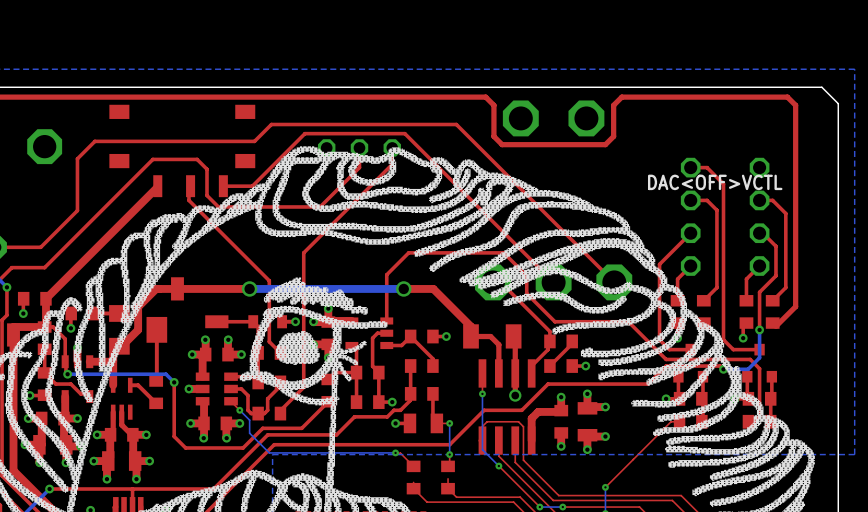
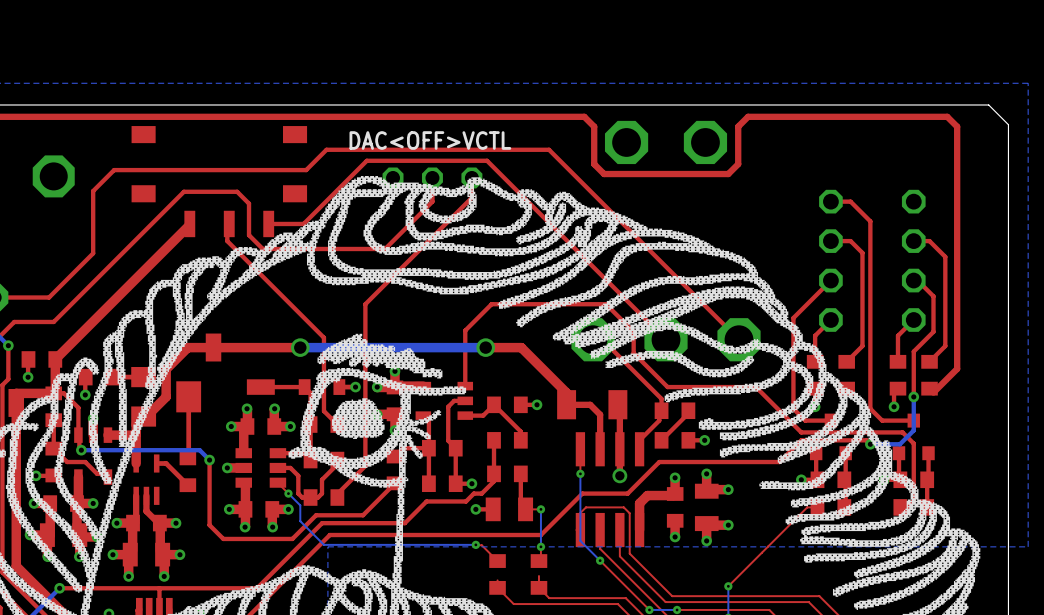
text: none -> DAC<OFF>VCTL (430, 140)
text: DAC<OFF>VCTL (715, 182) -> none

